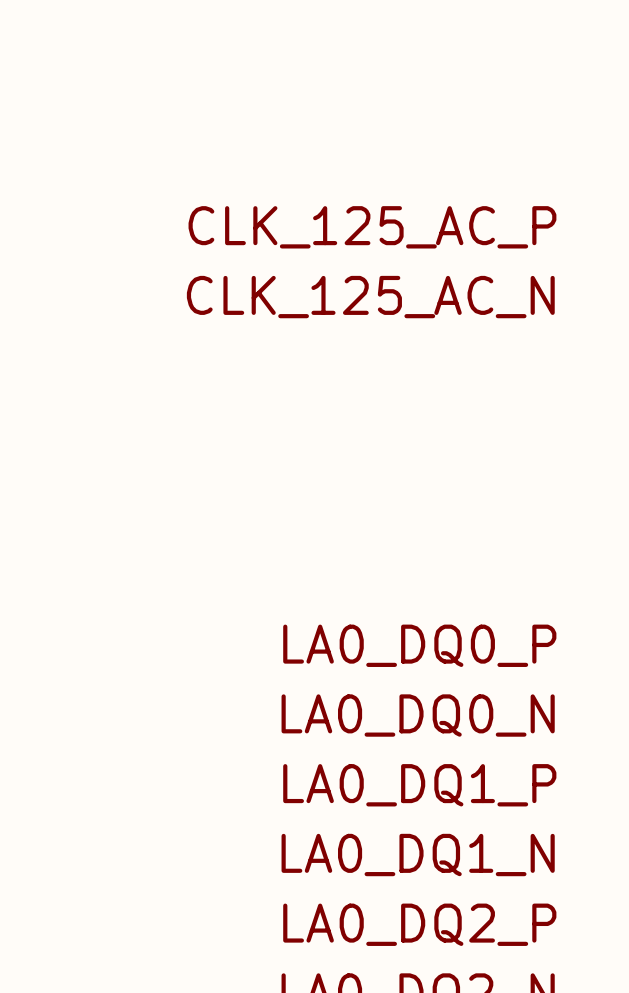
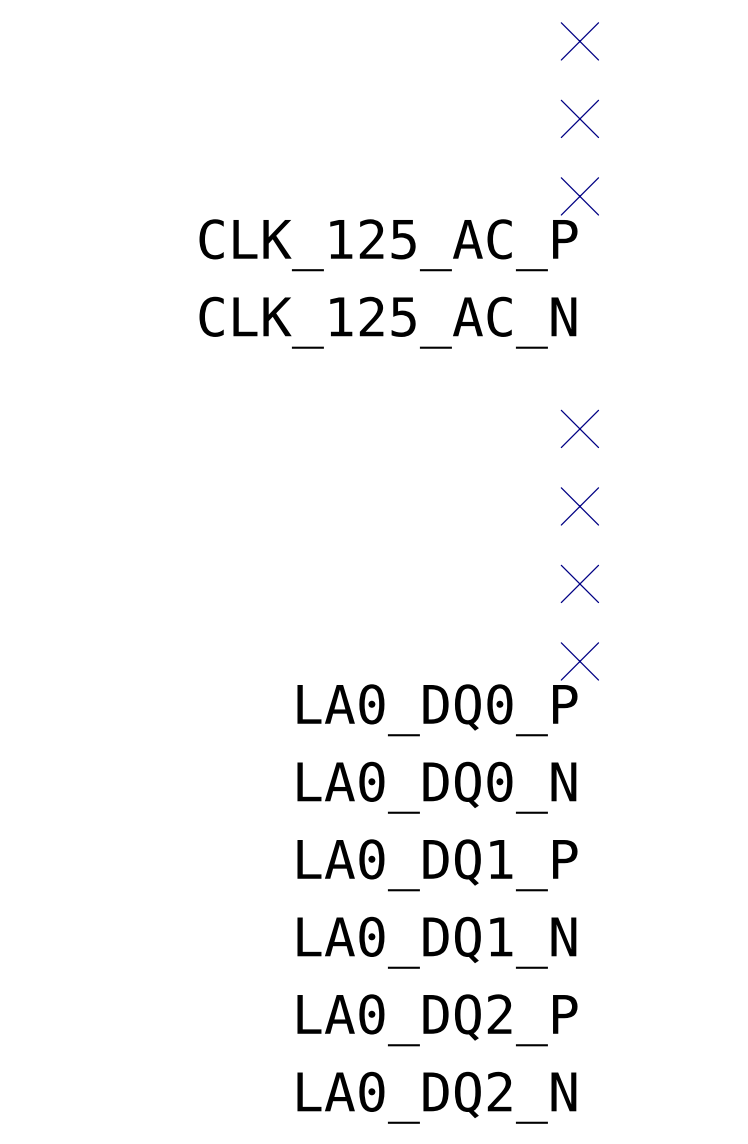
no-connect mark: none -> (579, 41)
no-connect mark: none -> (579, 118)
no-connect mark: none -> (579, 196)
no-connect mark: none -> (579, 428)
no-connect mark: none -> (579, 506)
no-connect mark: none -> (579, 583)
no-connect mark: none -> (579, 661)

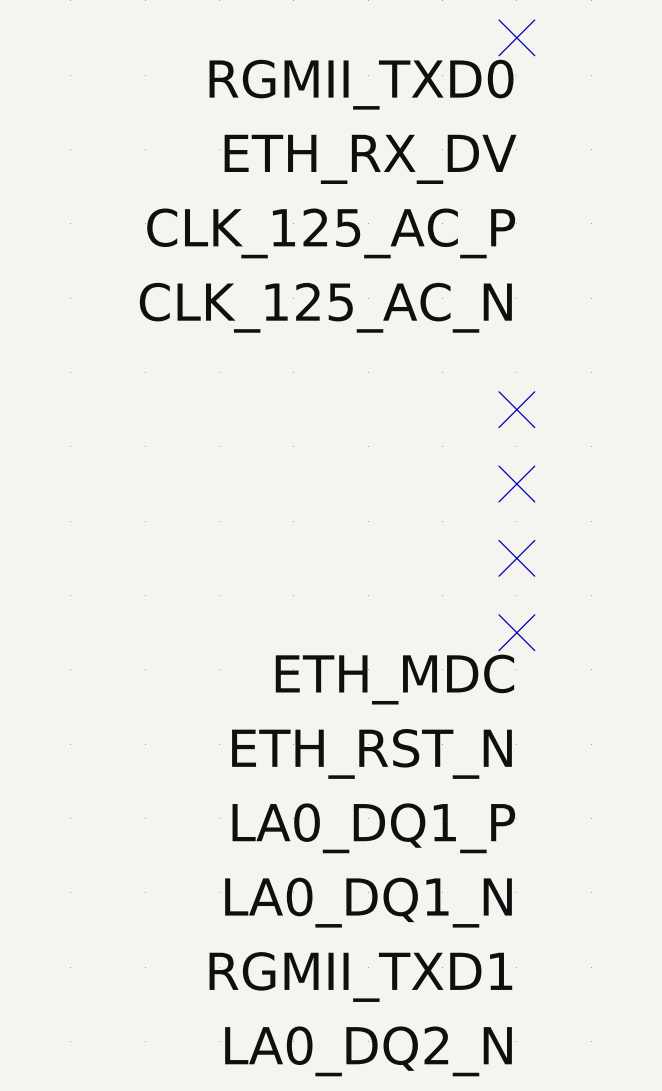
label: none -> RGMII_TXD0 (361, 84)
no-connect mark: (579, 118) -> none
label: none -> ETH_RX_DV (370, 159)
no-connect mark: (579, 196) -> none
label: LA0_DQ0_P (437, 710) -> ETH_MDC (394, 679)
label: LA0_DQ0_N (436, 787) -> ETH_RST_N (371, 753)
label: LA0_DQ2_P (437, 1020) -> RGMII_TXD1 (360, 977)

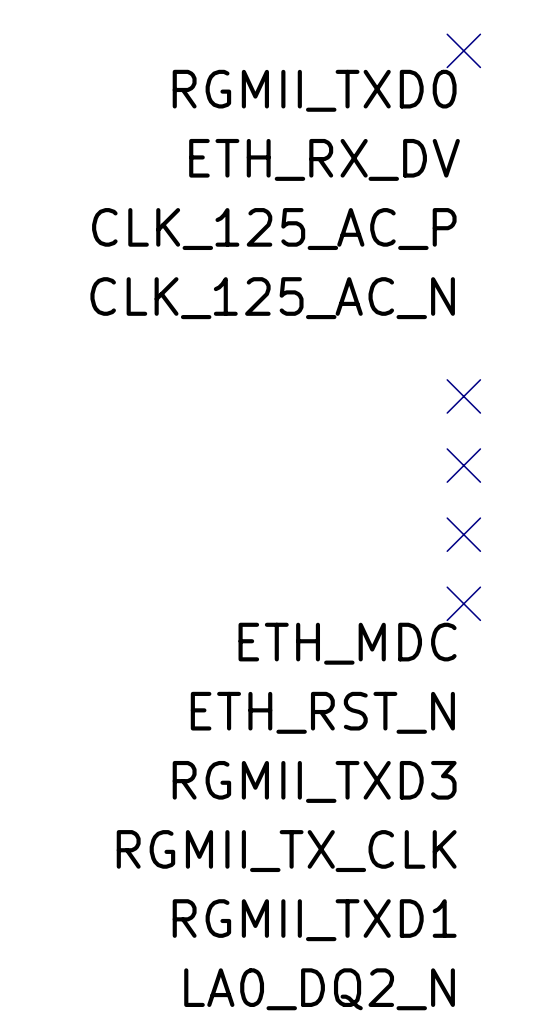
label: LA0_DQ1_P (373, 828) -> RGMII_TXD3 (314, 781)
label: LA0_DQ1_N (368, 902) -> RGMII_TX_CLK (286, 851)

